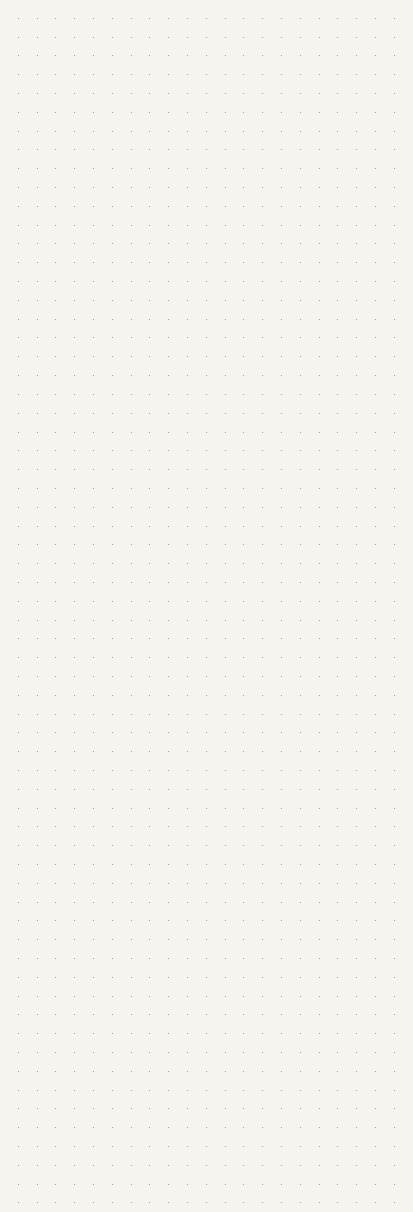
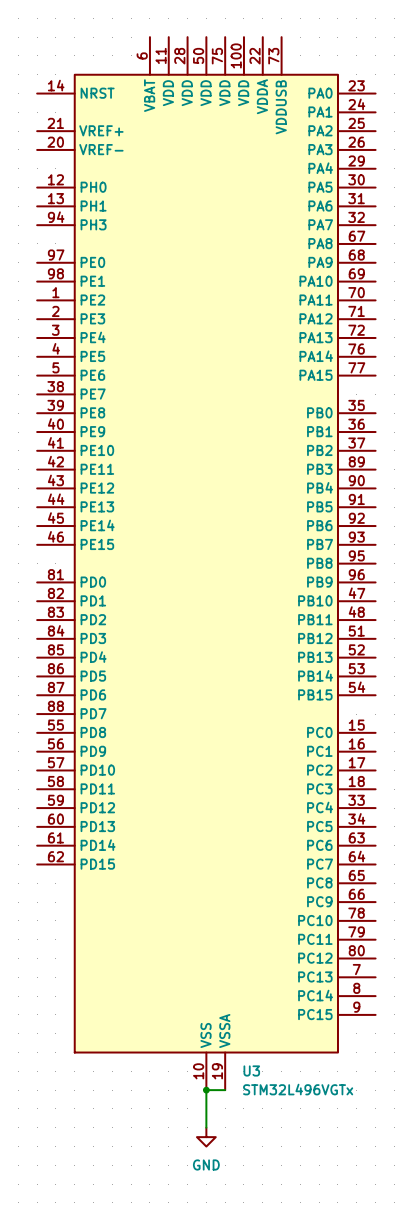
U3: none -> STM32L496VGTx (206, 563)
junction: none -> (206, 1090)
wire: none -> (225, 1090) (206, 1090) (206, 1127)
power symbol: none -> GND (206, 1137)

